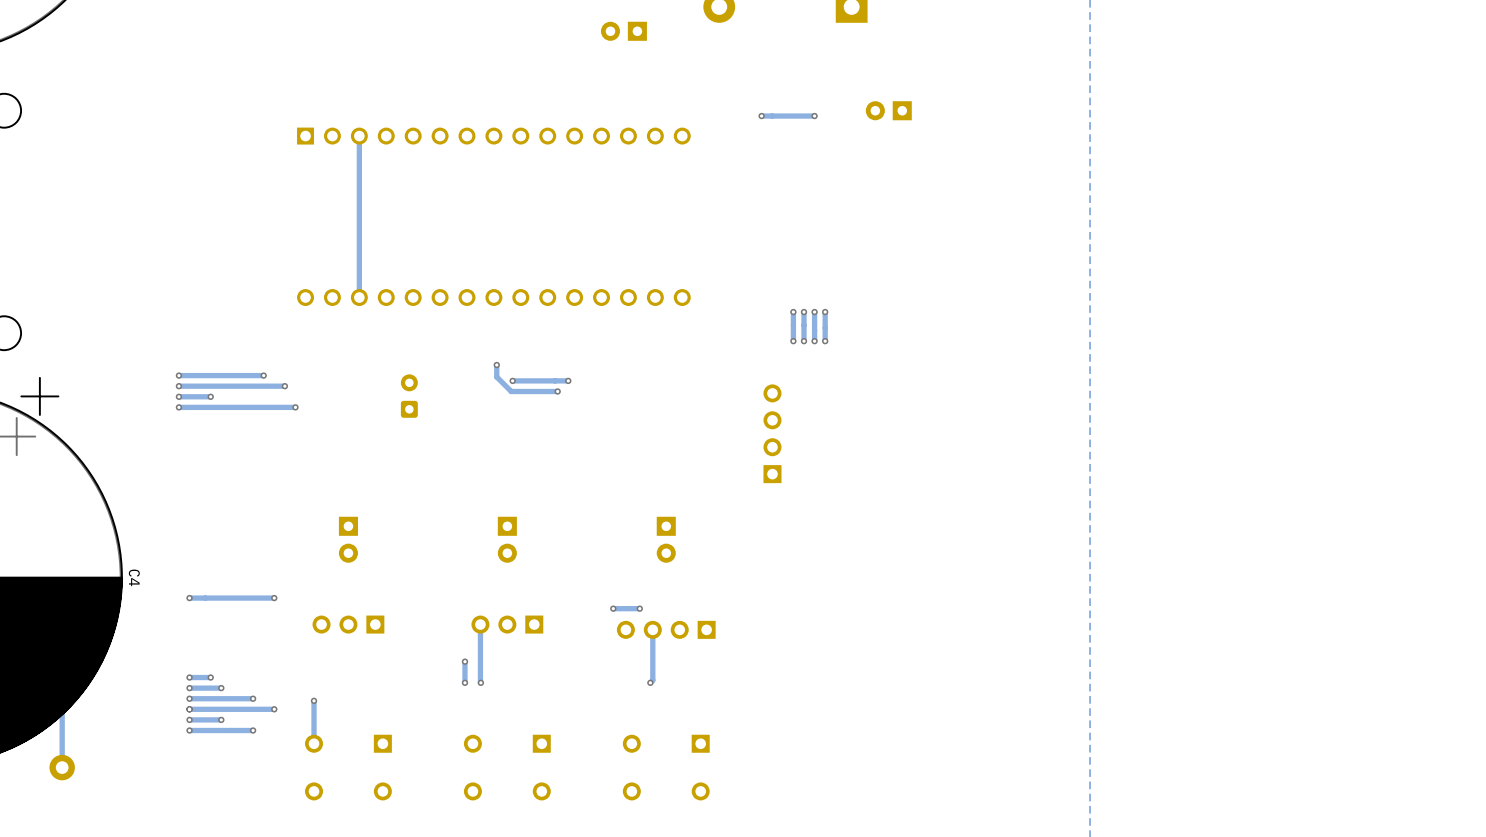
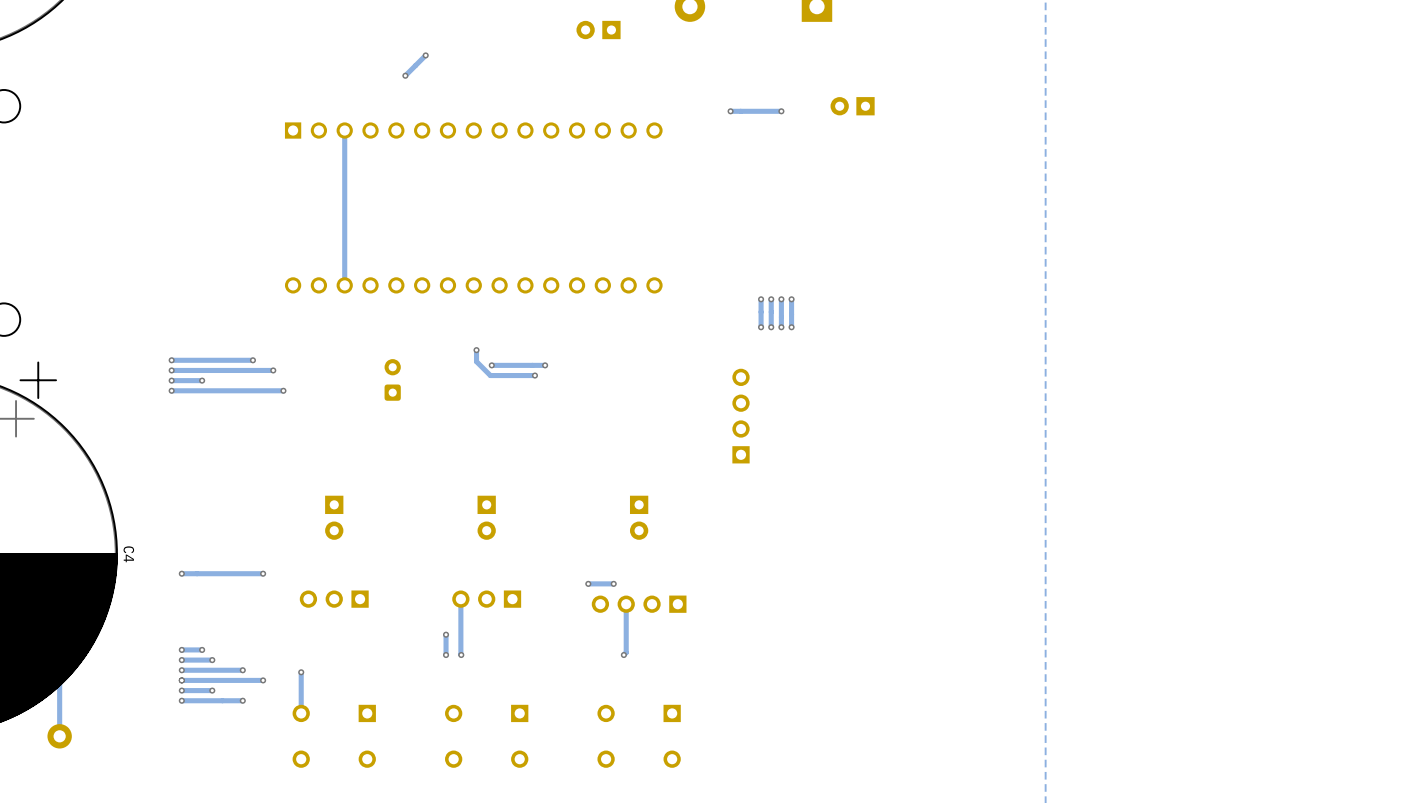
track: none -> (425, 55) (405, 75)
via: none -> (425, 55)
via: none -> (405, 75)

